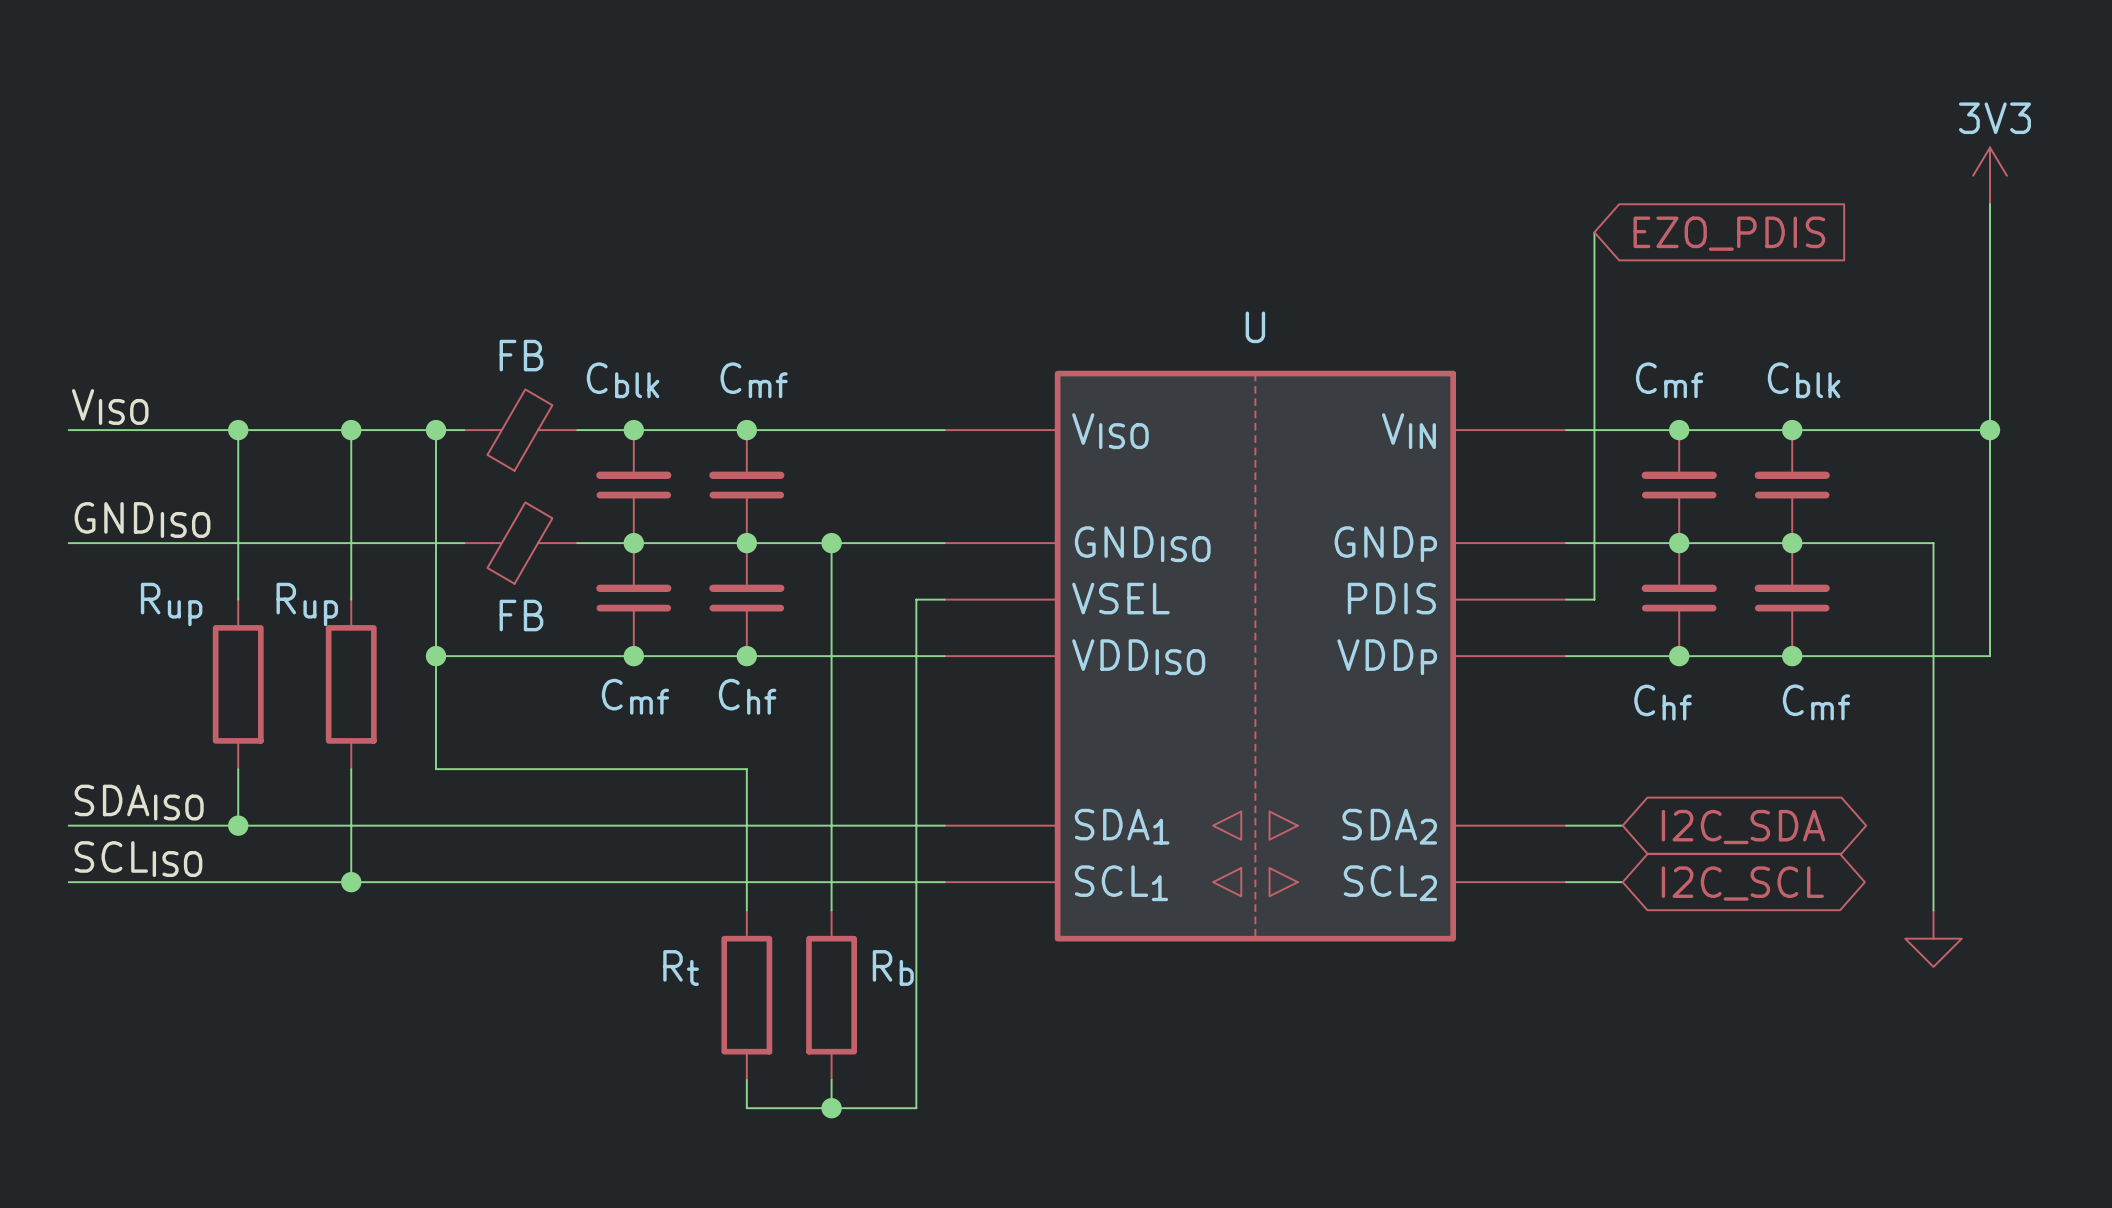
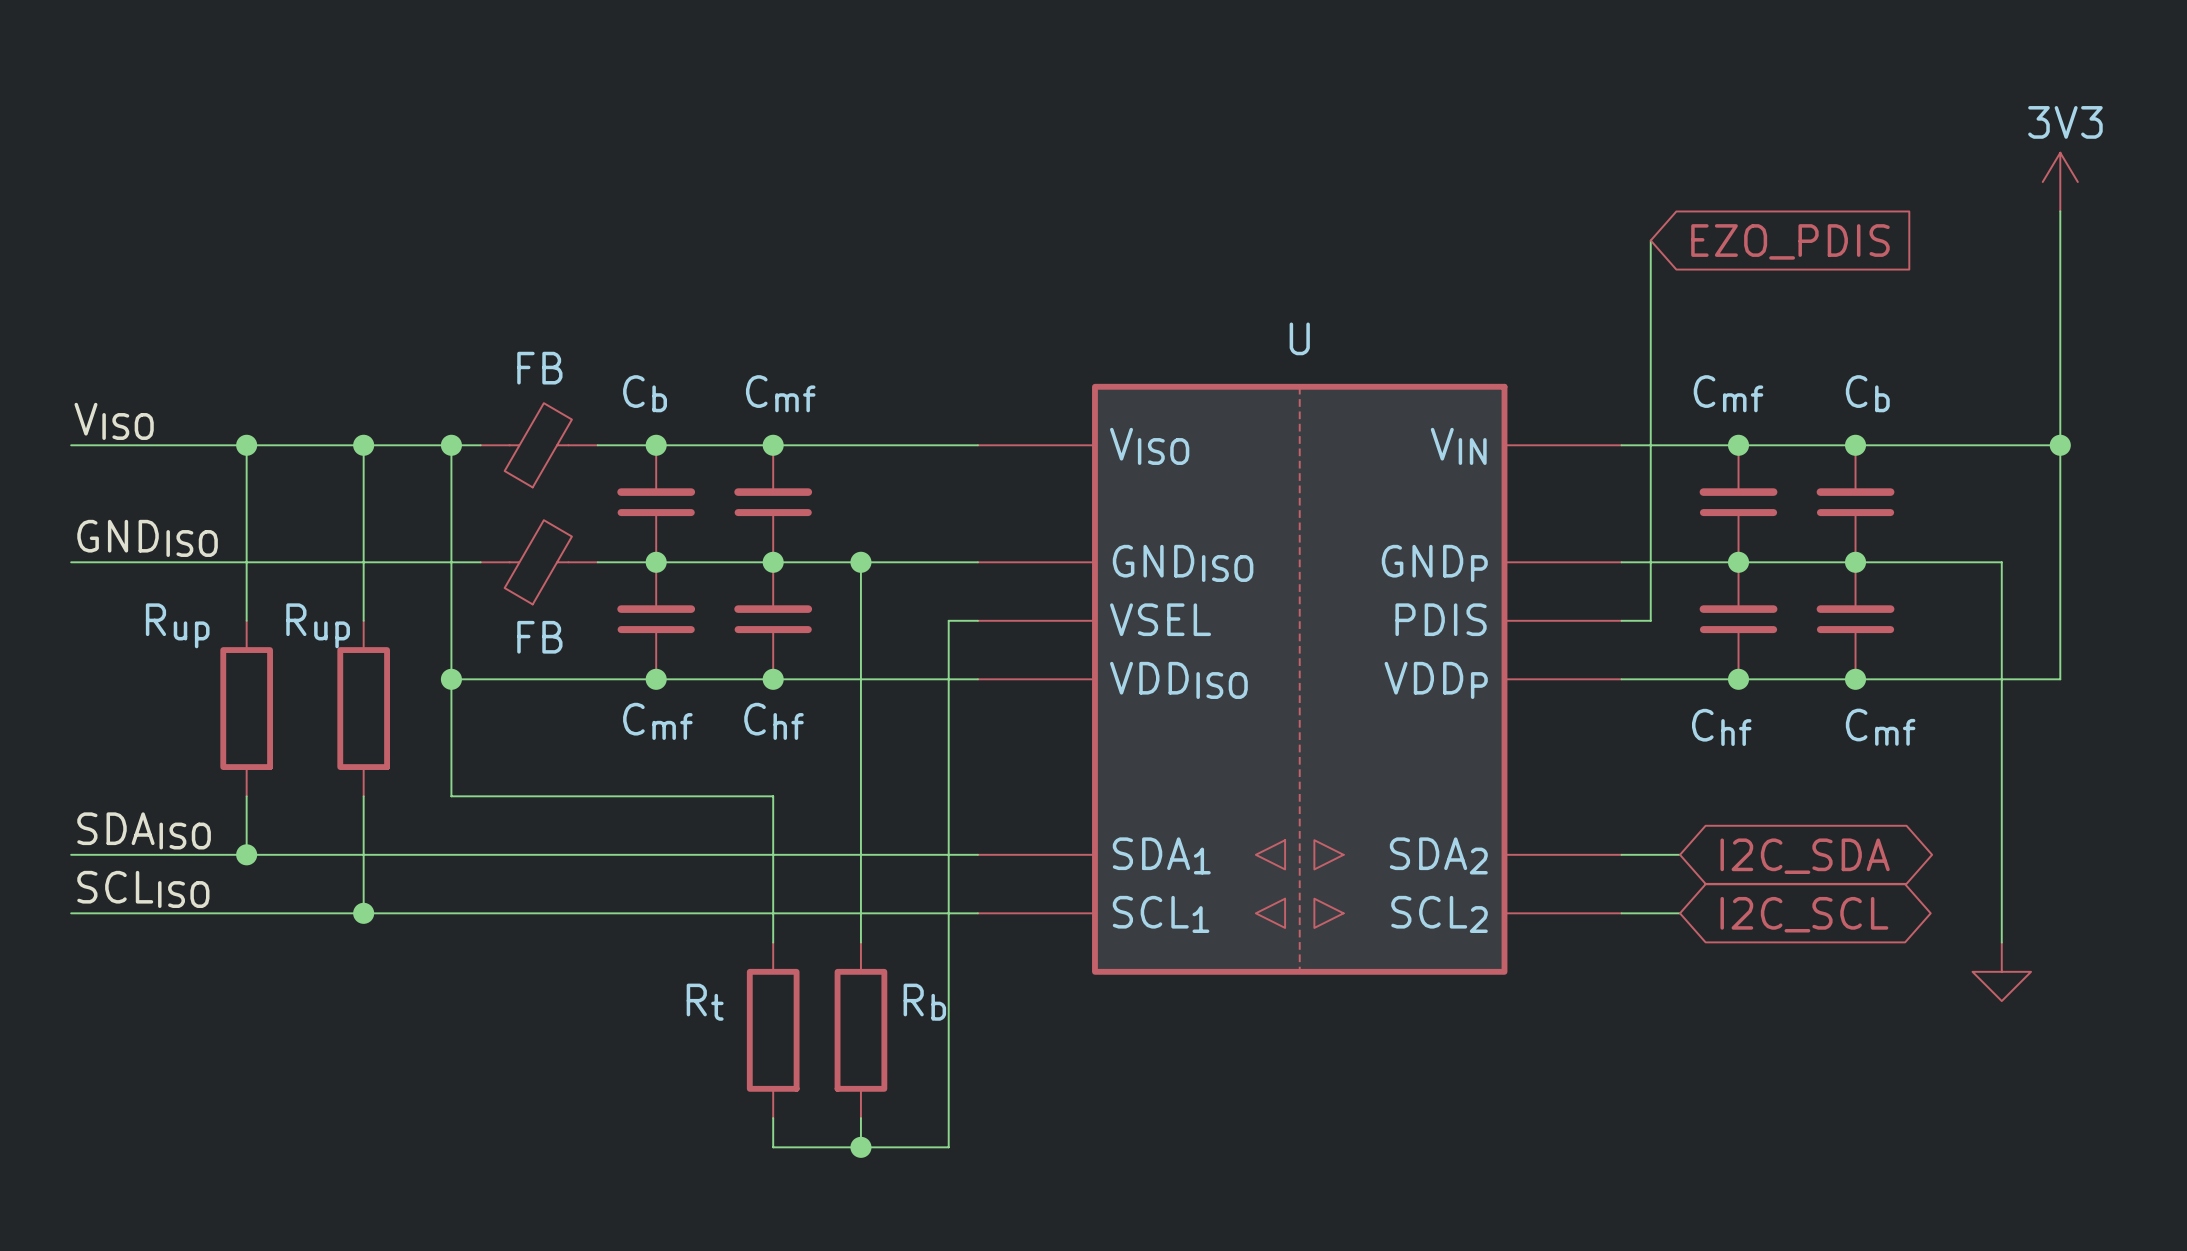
Cblk name: Cblk (623, 380) -> Cb (645, 393)
Cblk name: Cblk (1804, 380) -> Cb (1867, 393)

